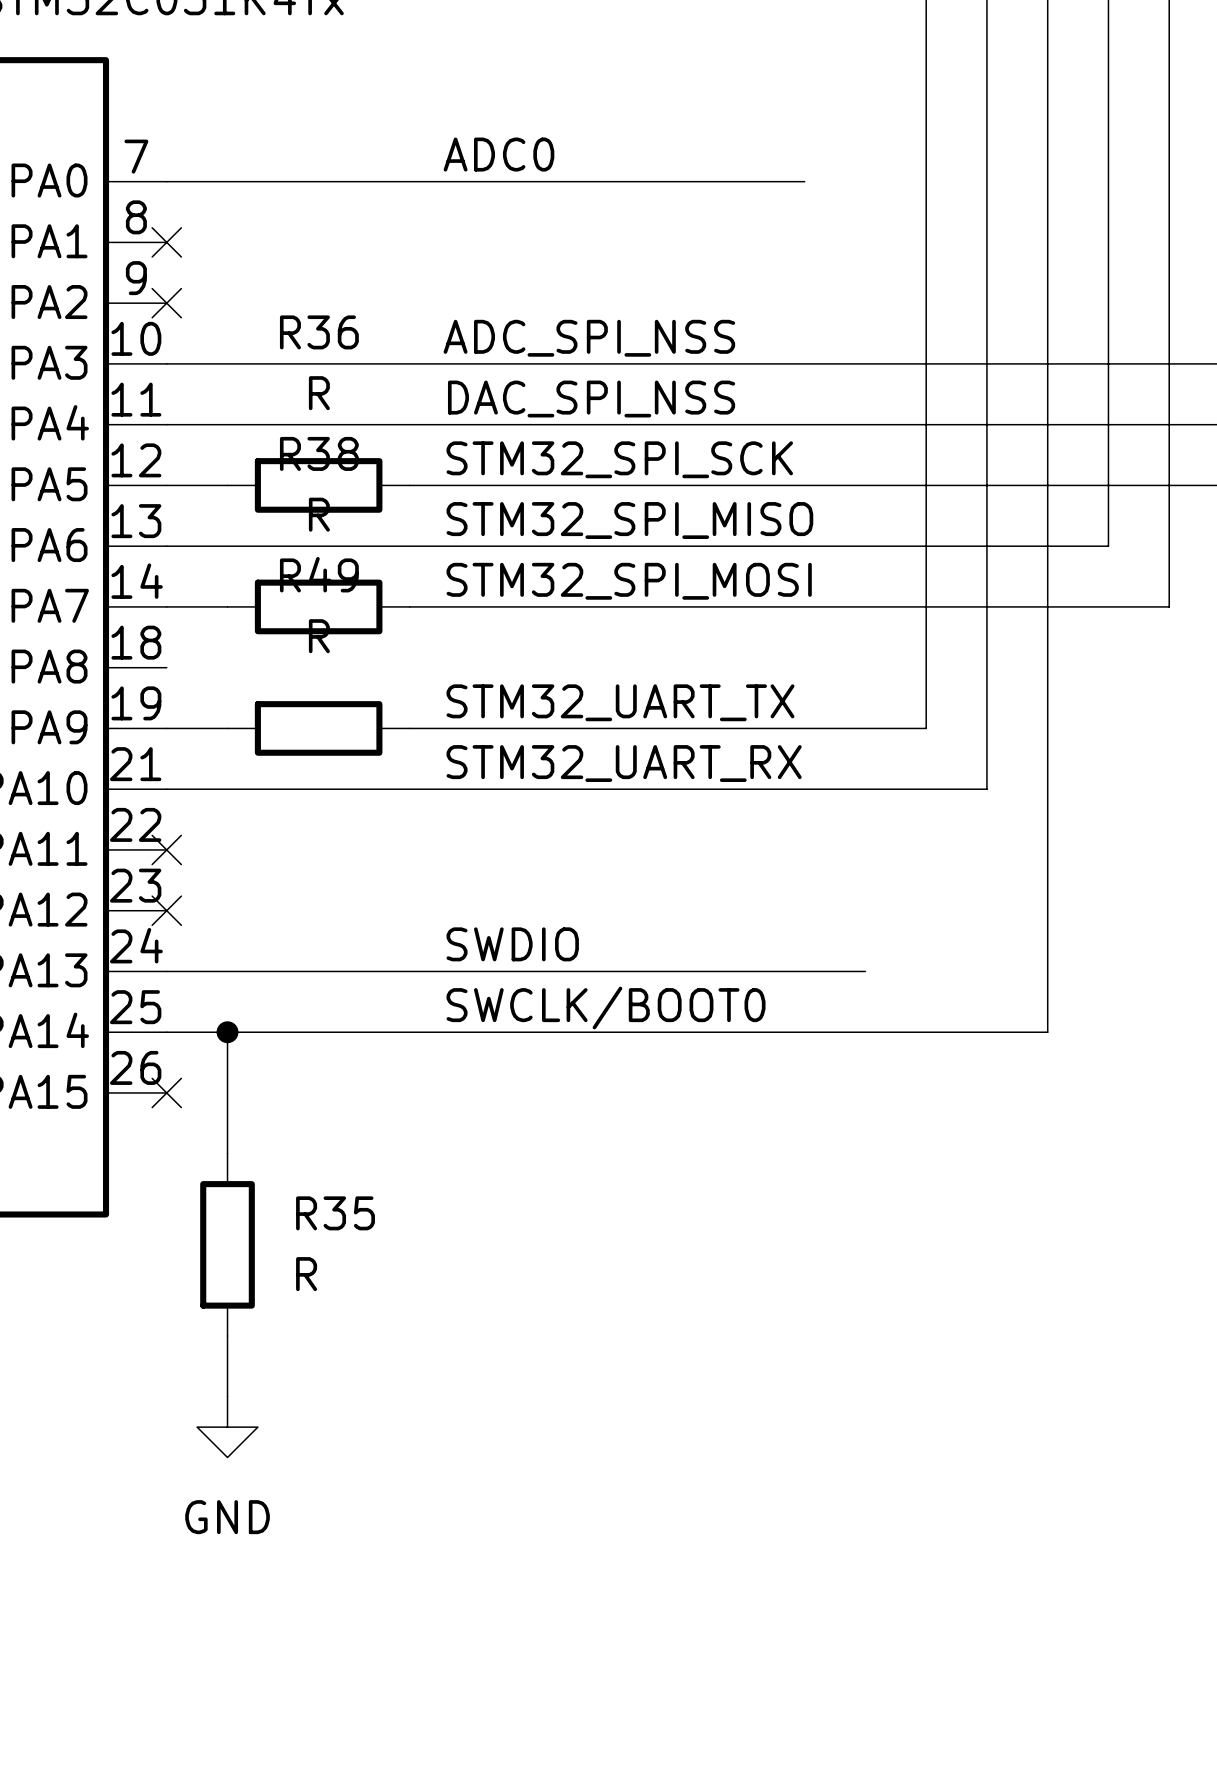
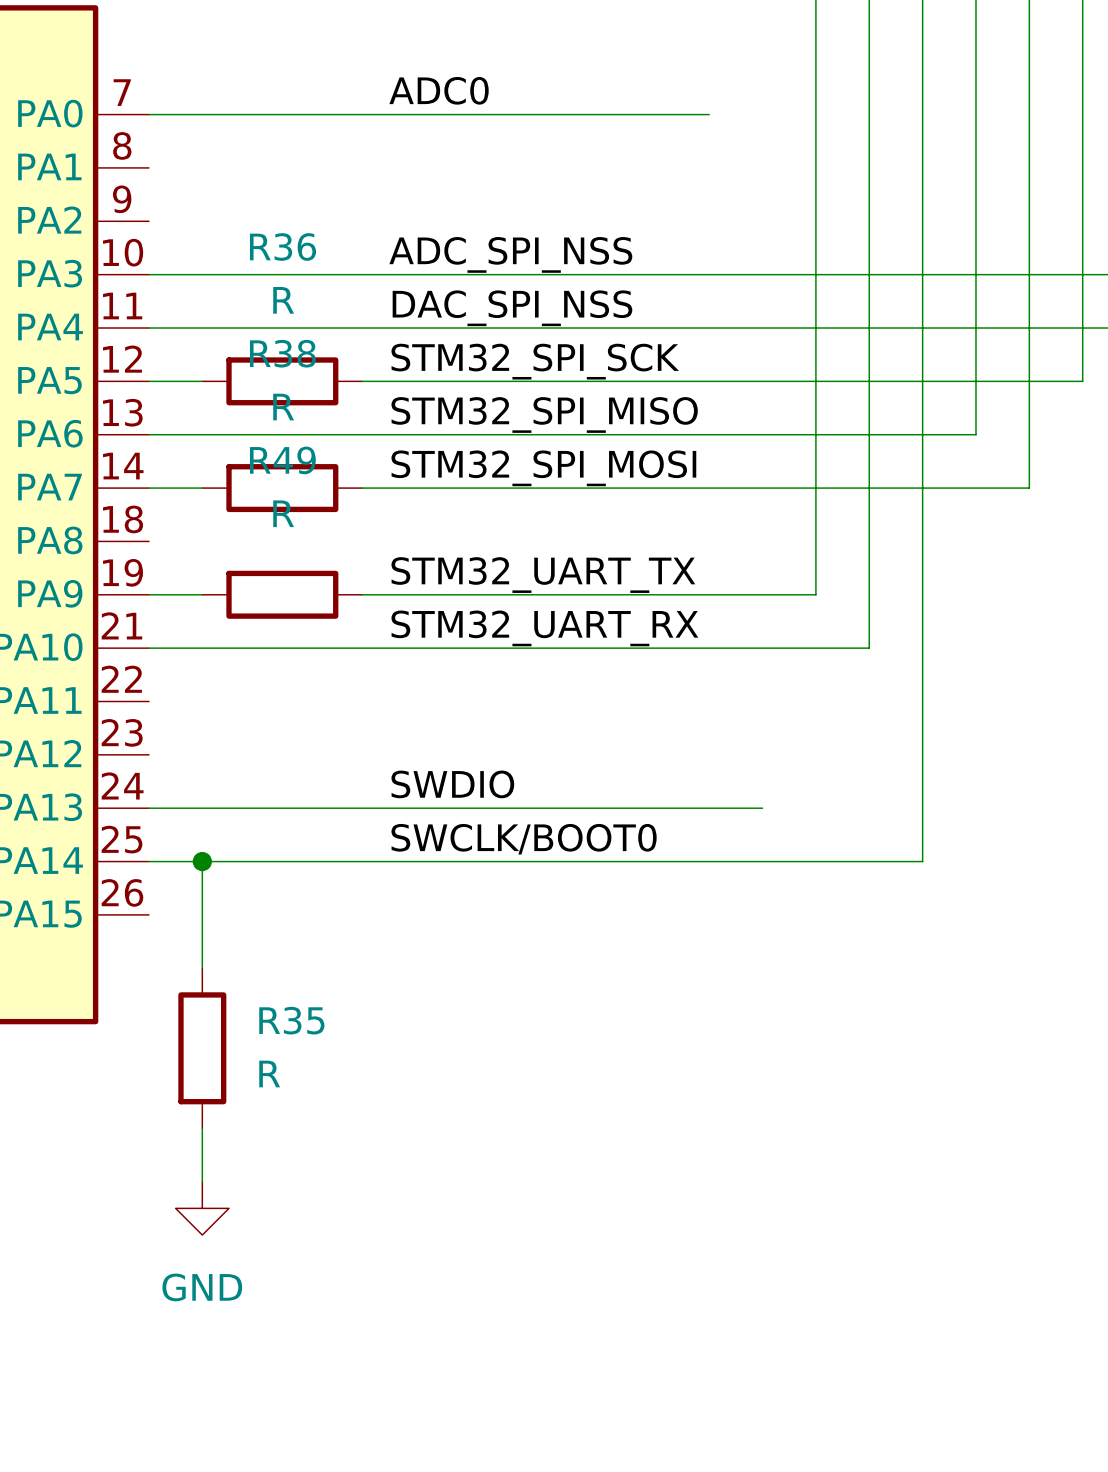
no-connect mark: (166, 242) -> none
no-connect mark: (166, 303) -> none
no-connect mark: (166, 849) -> none
no-connect mark: (166, 910) -> none
no-connect mark: (166, 1092) -> none

